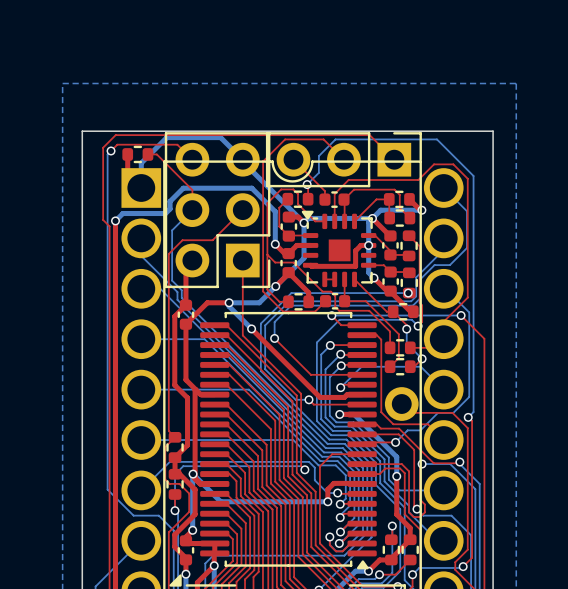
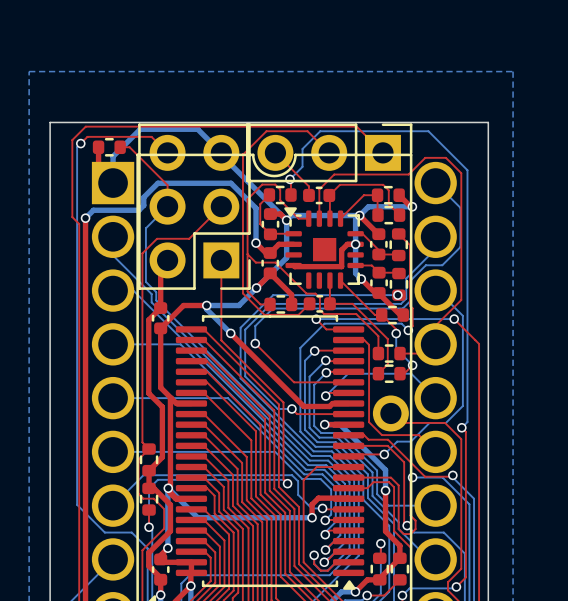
top track: (324, 279) (334, 279) -> none

